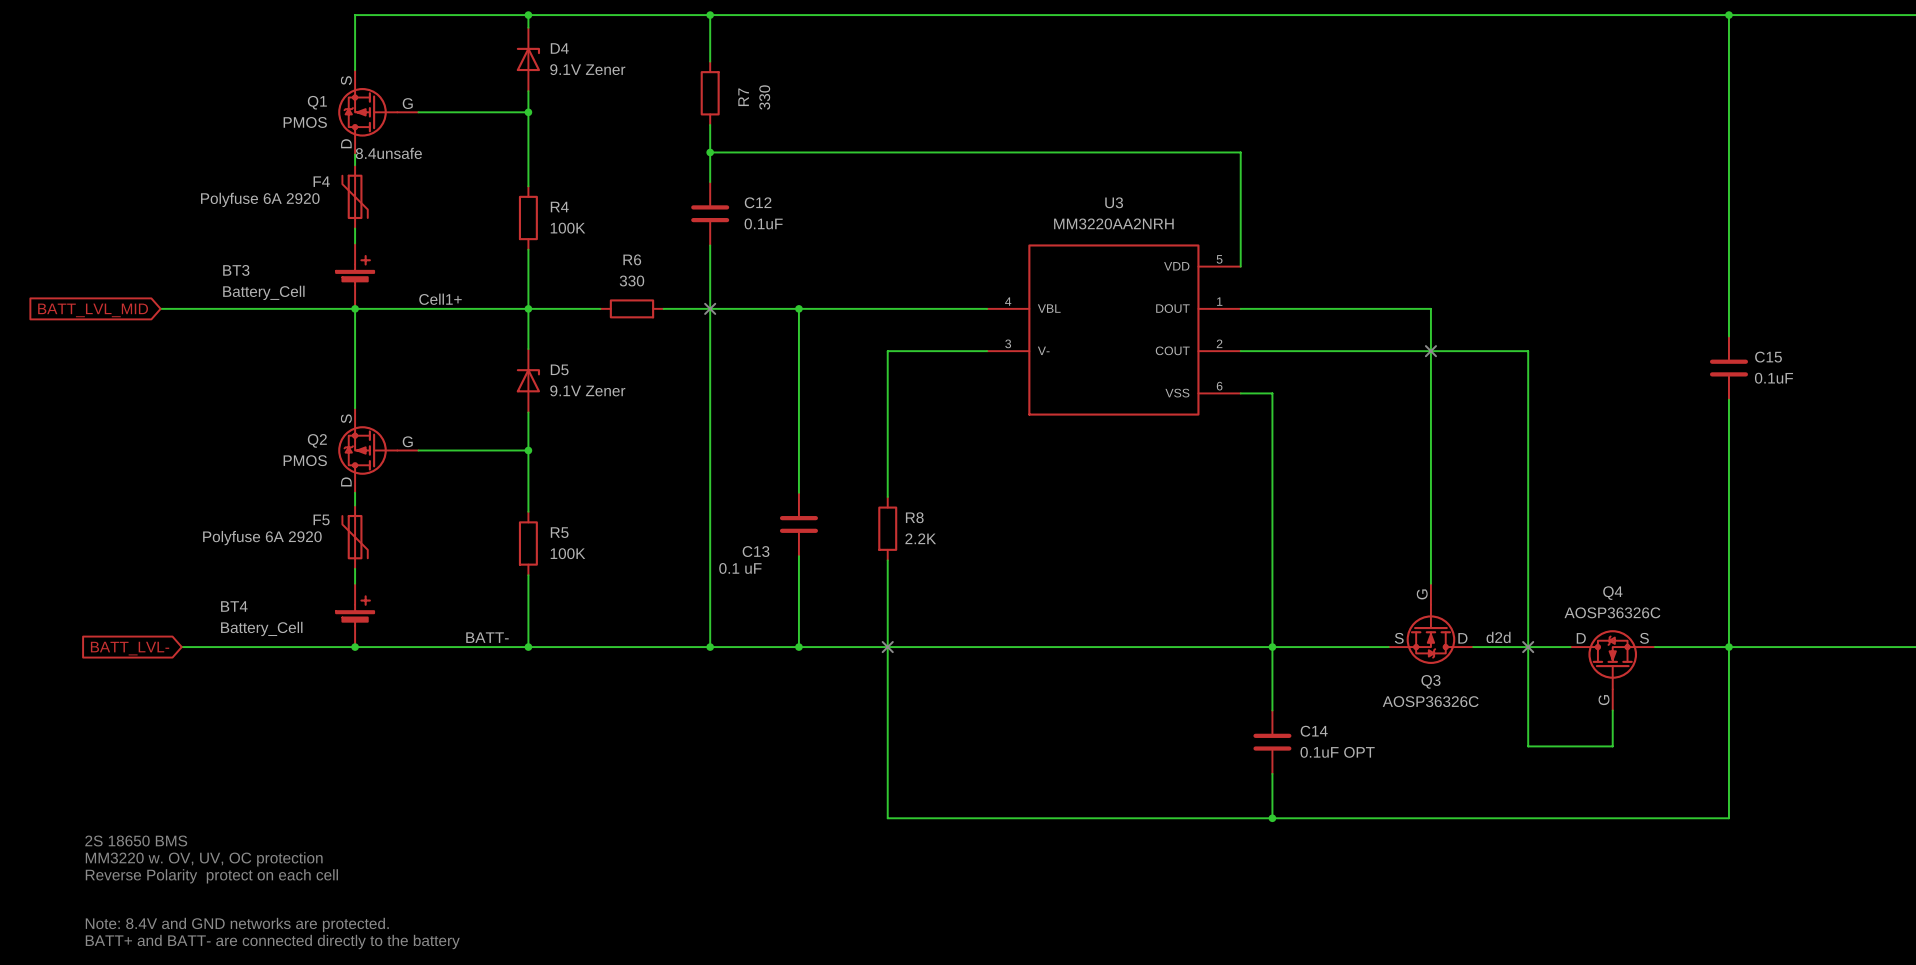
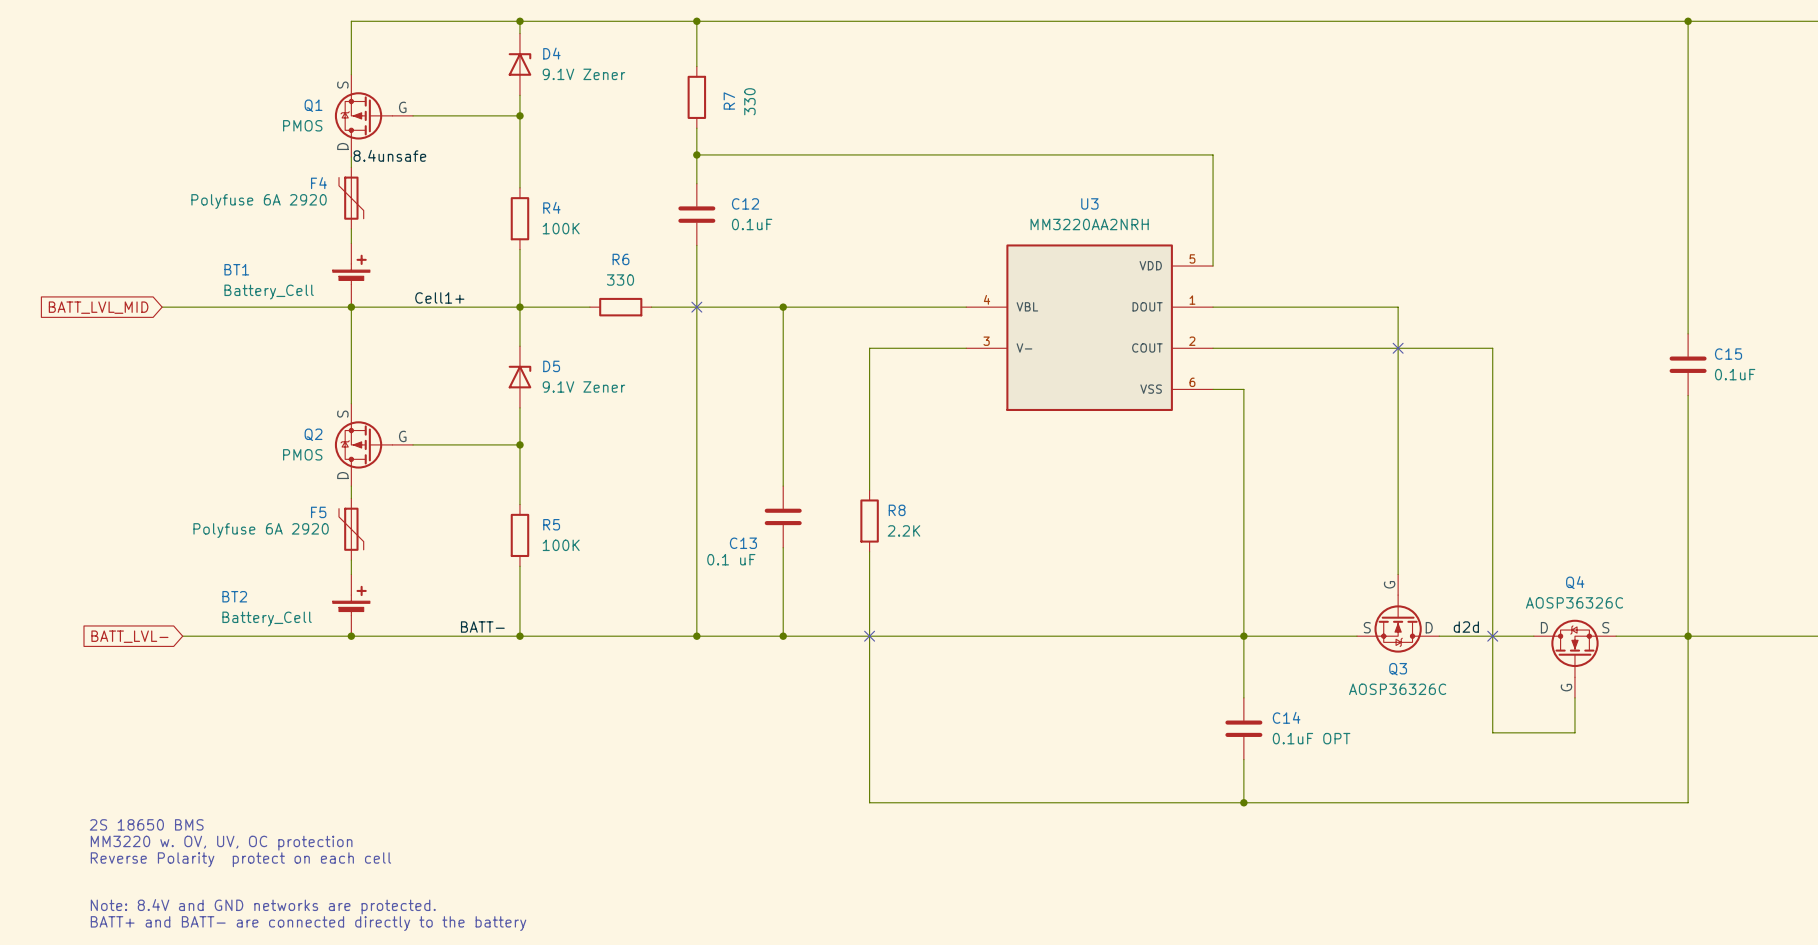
BT3 name: BT3 (236, 270) -> BT1 (236, 269)
BT4 name: BT4 (234, 606) -> BT2 (234, 596)

